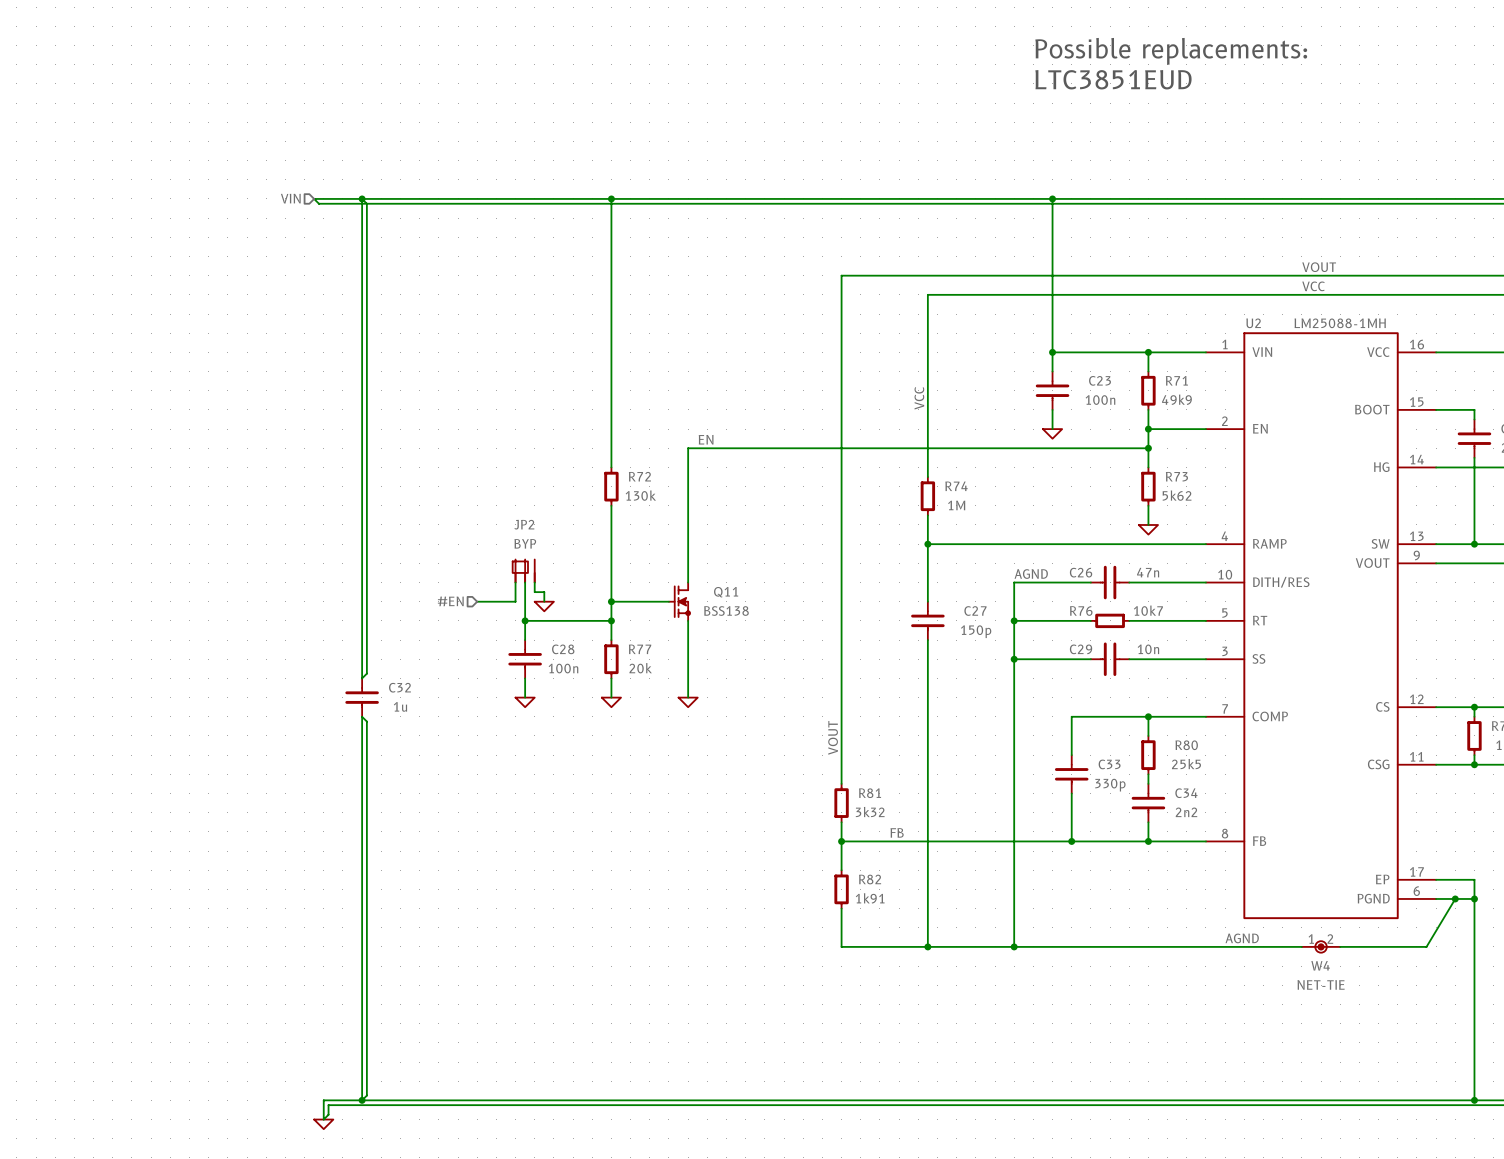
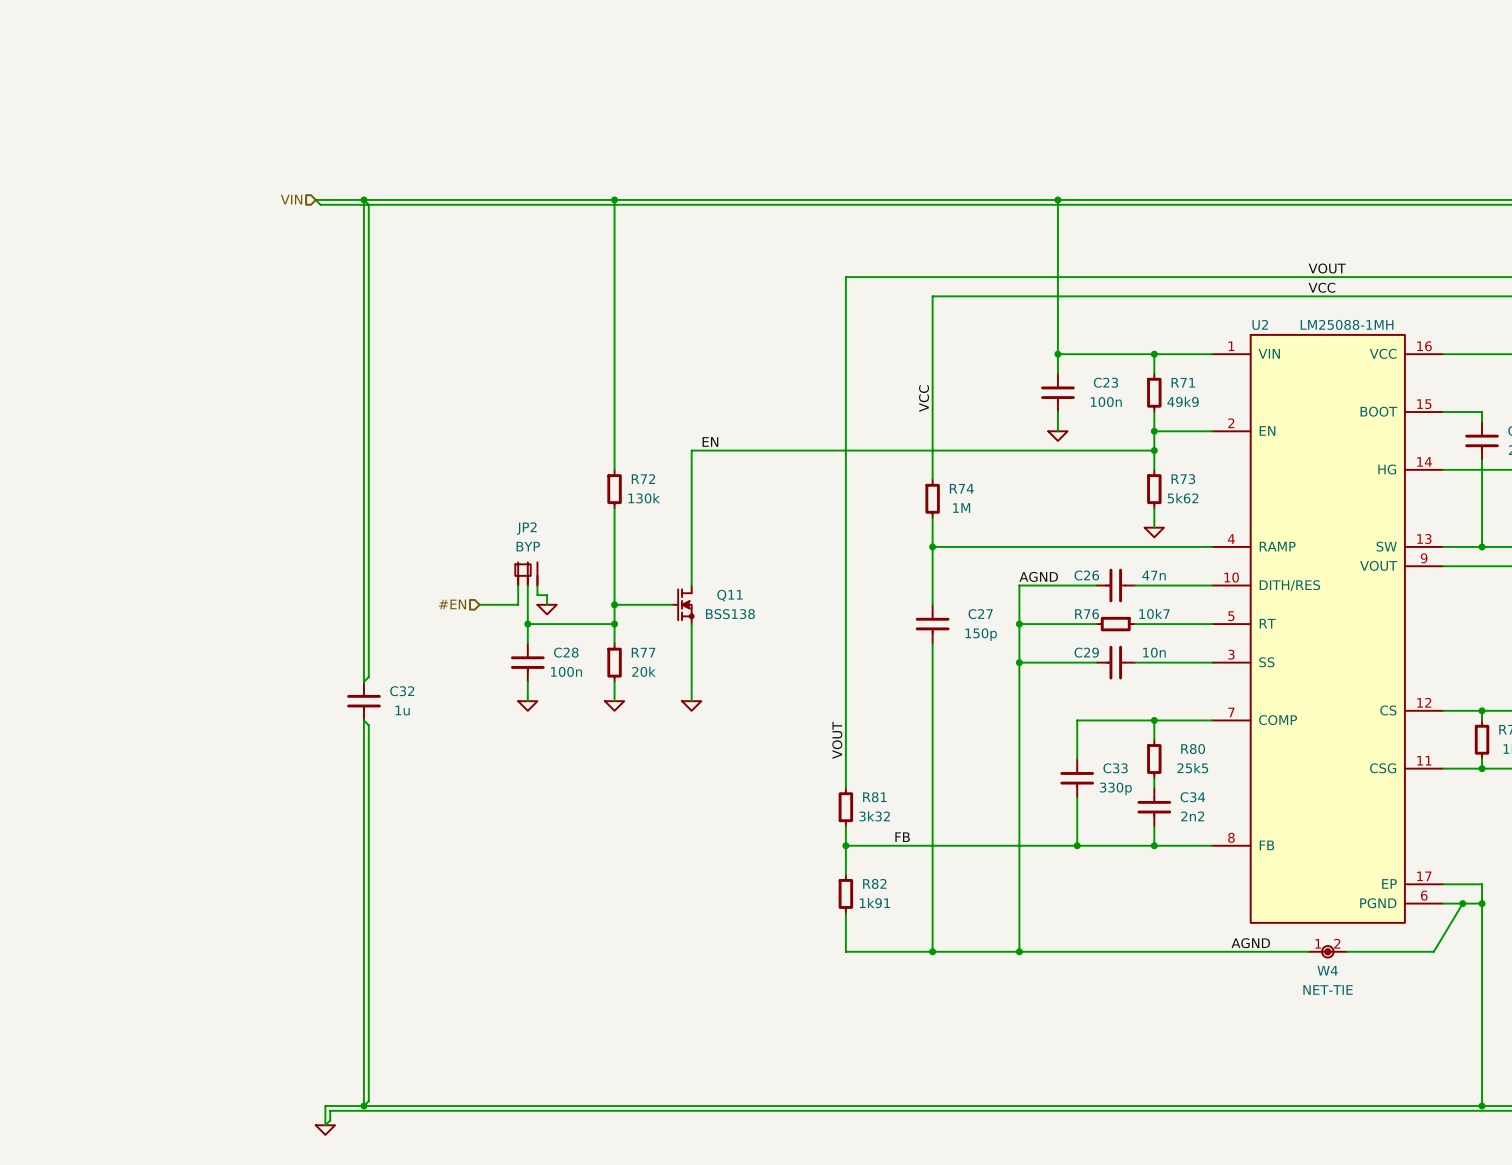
text: Possible replacements: (1171, 51) -> none
text: LTC3851EUD (1113, 79) -> none

